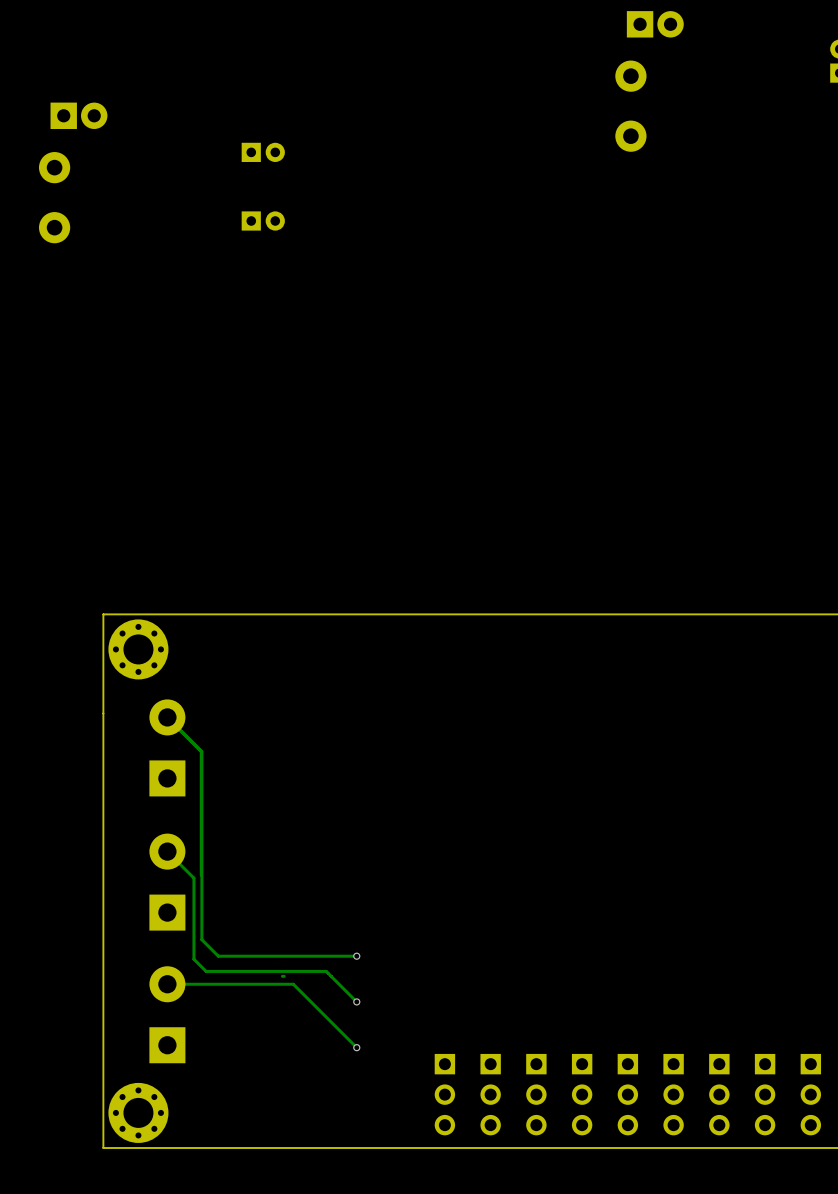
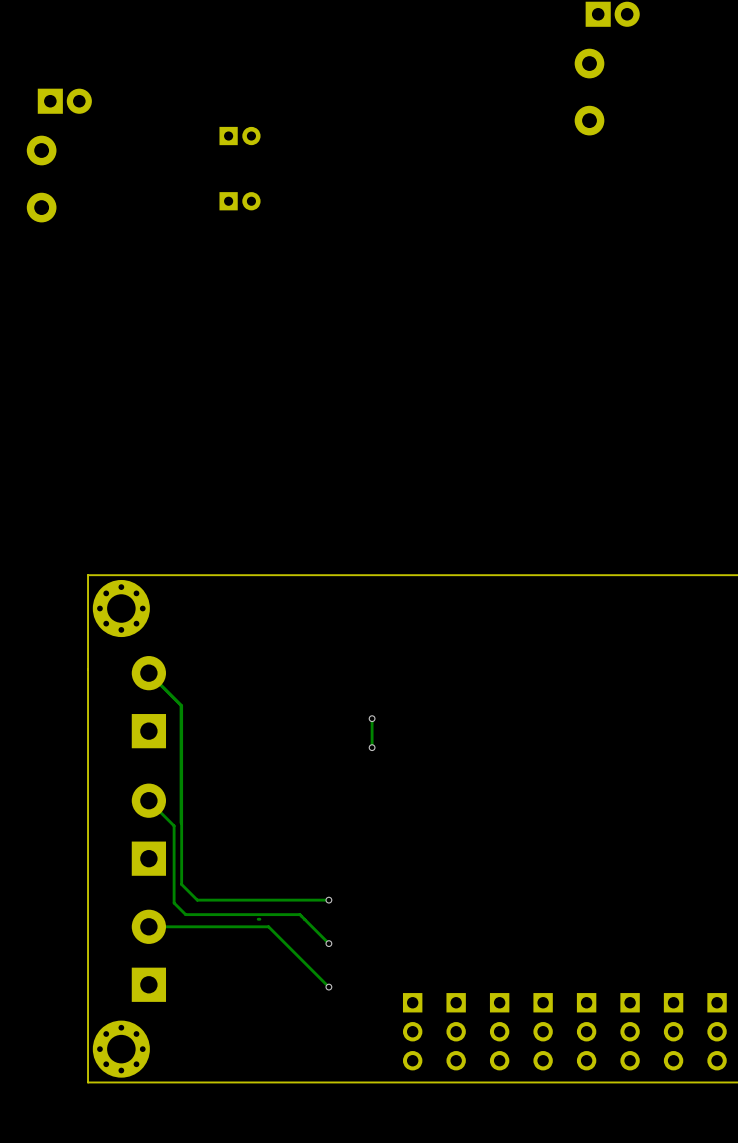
track: none -> (372, 718) (372, 747)
via: none -> (372, 718)
via: none -> (372, 747)

